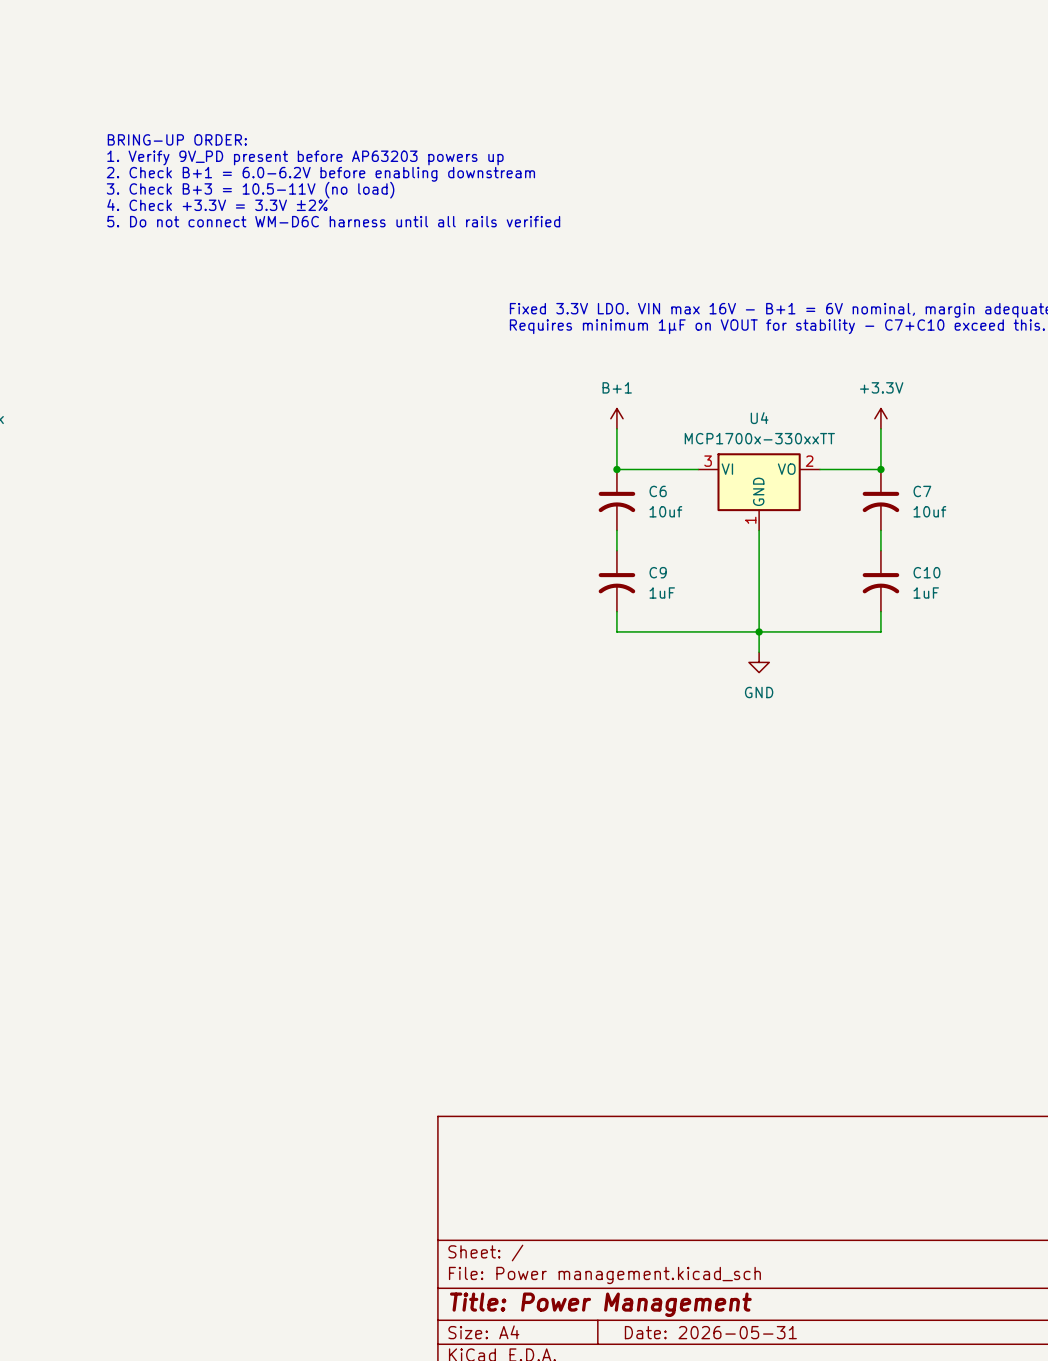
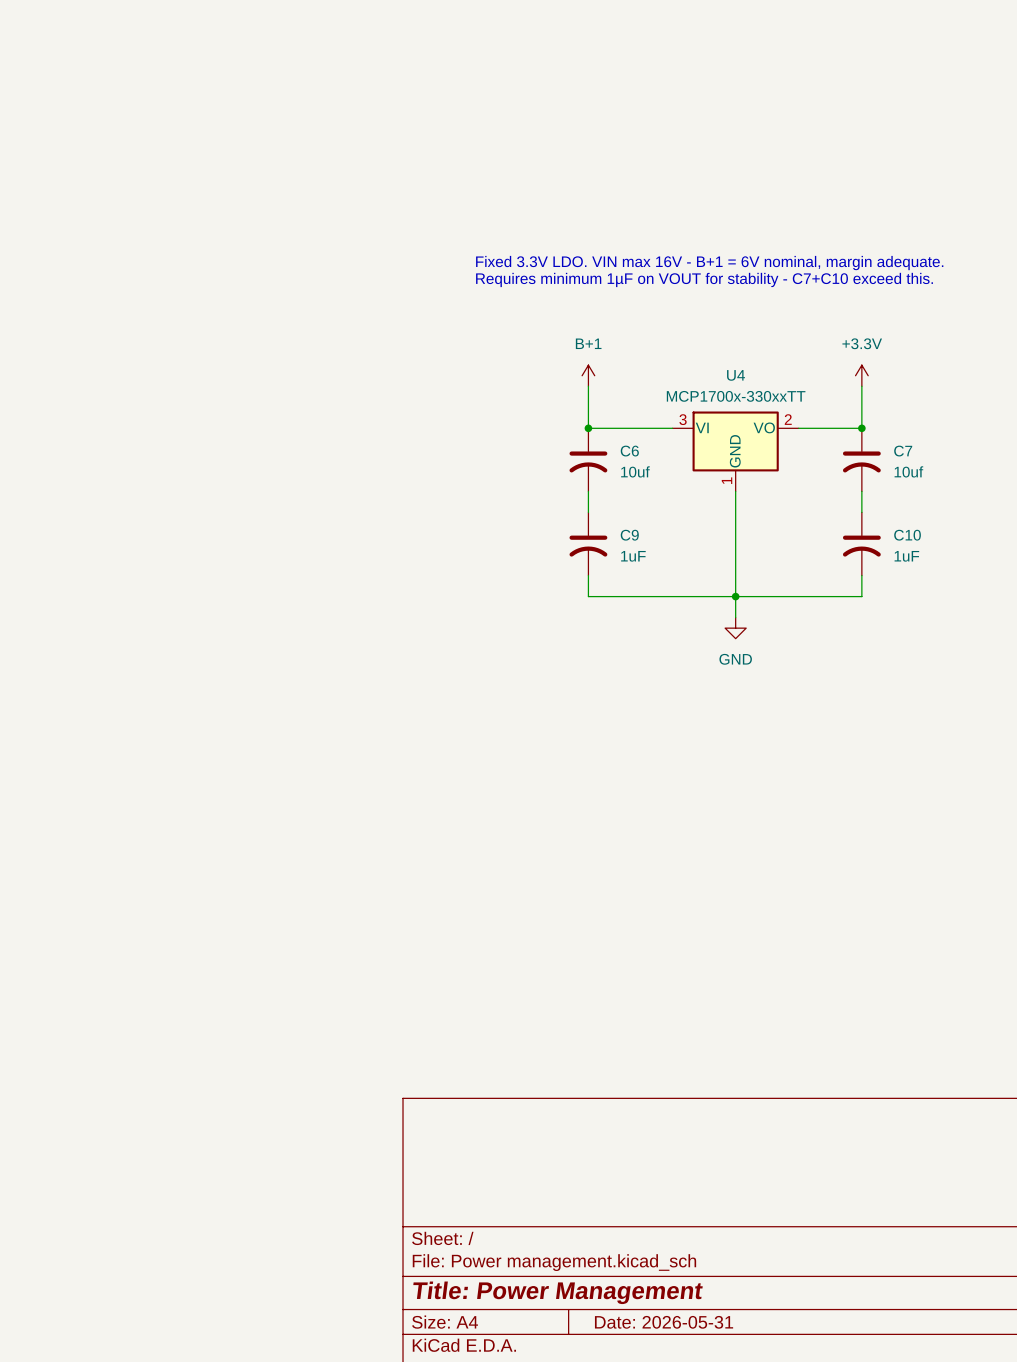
text: BRING-UP ORDER: (177, 139) -> none
text: 1. Verify 9V_PD present before AP63203 powers up (305, 157) -> none
text: 2. Check B+1 = 6.0-6.2V before enabling downstream (320, 174) -> none
text: 3. Check B+3 = 10.5-11V (no load) (250, 190) -> none
text: 4. Check +3.3V = 3.3V ±2% (217, 205) -> none
text: 5. Do not connect WM-D6C harness until all rails verified (333, 221) -> none

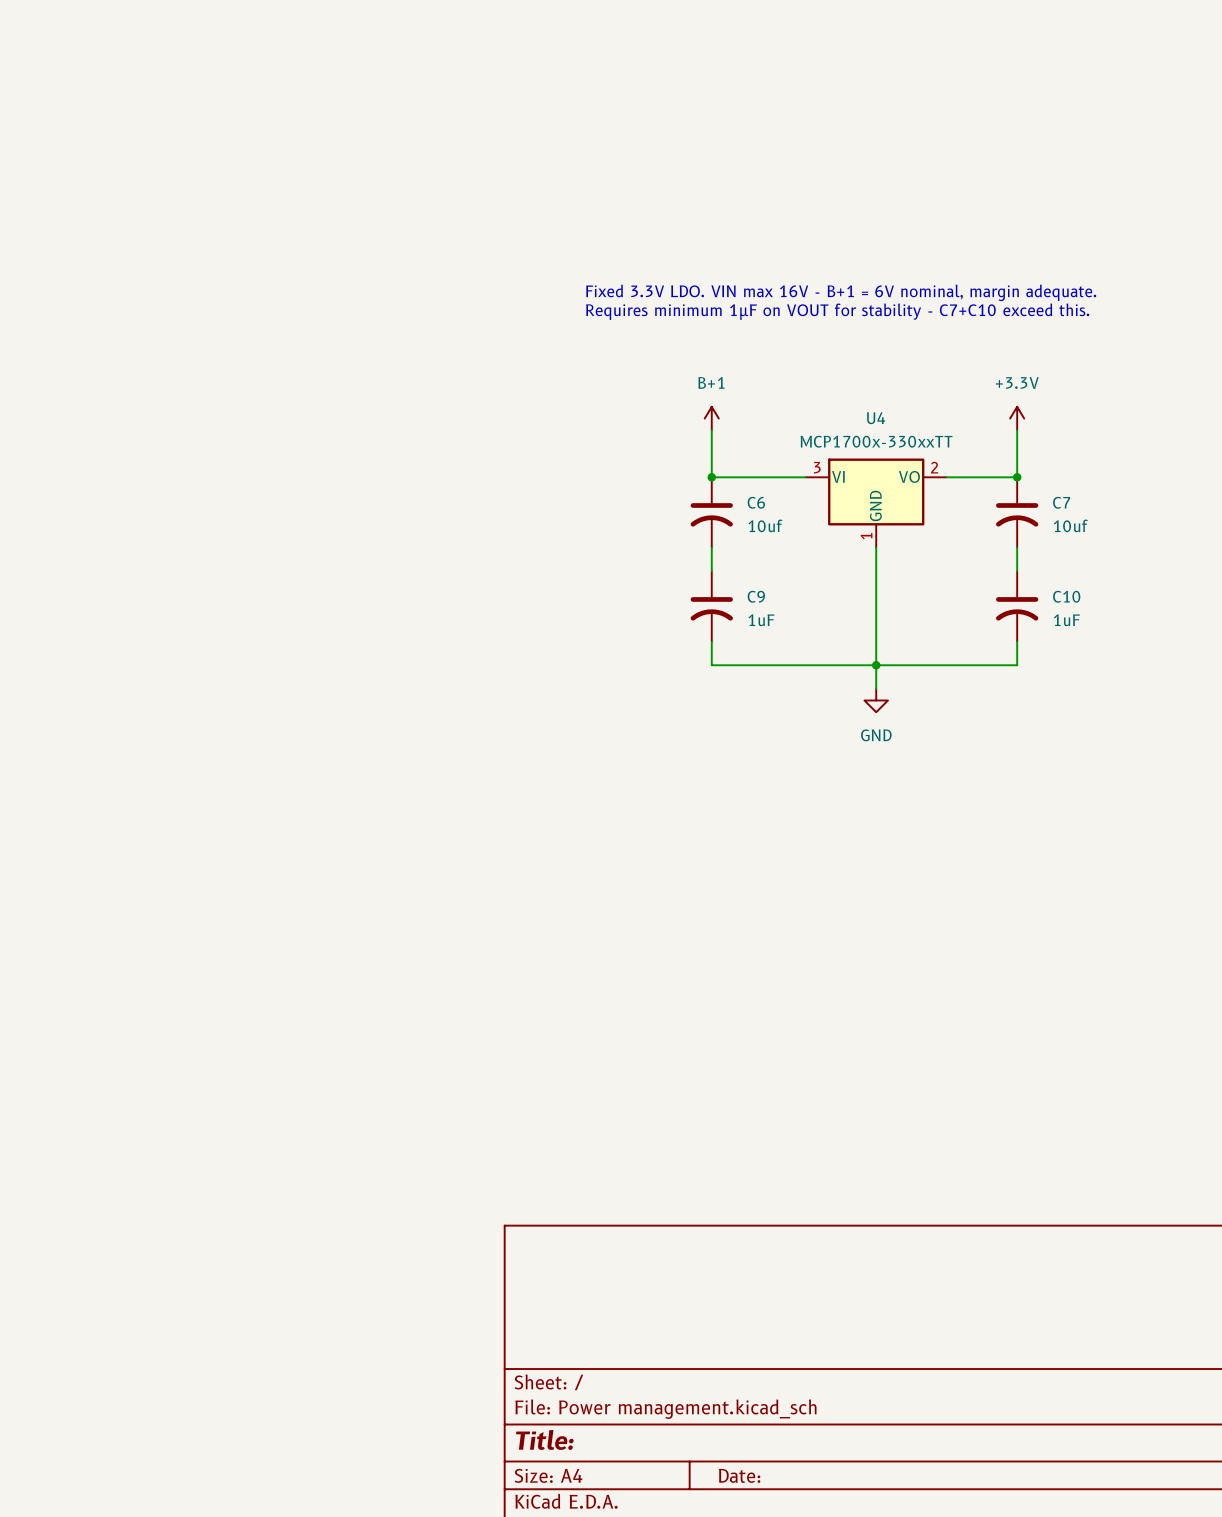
title block: Title: Power Management (558, 1292) -> Title: (544, 1439)
title block: Date: 2026-05-31 (664, 1322) -> Date: (739, 1475)

